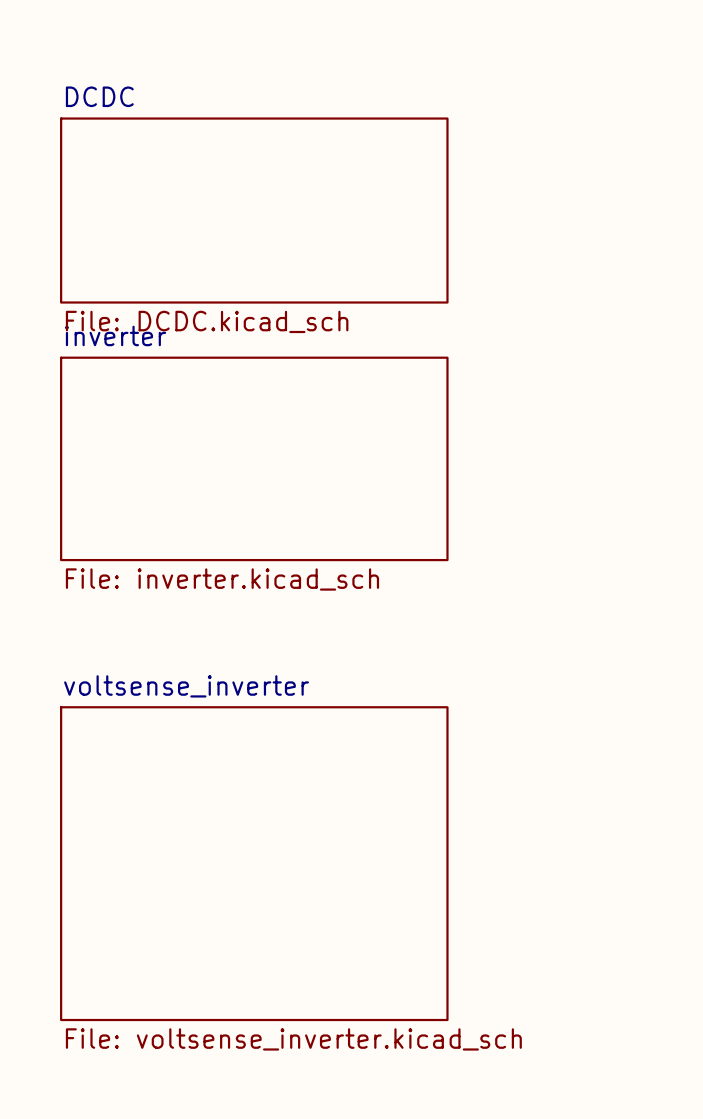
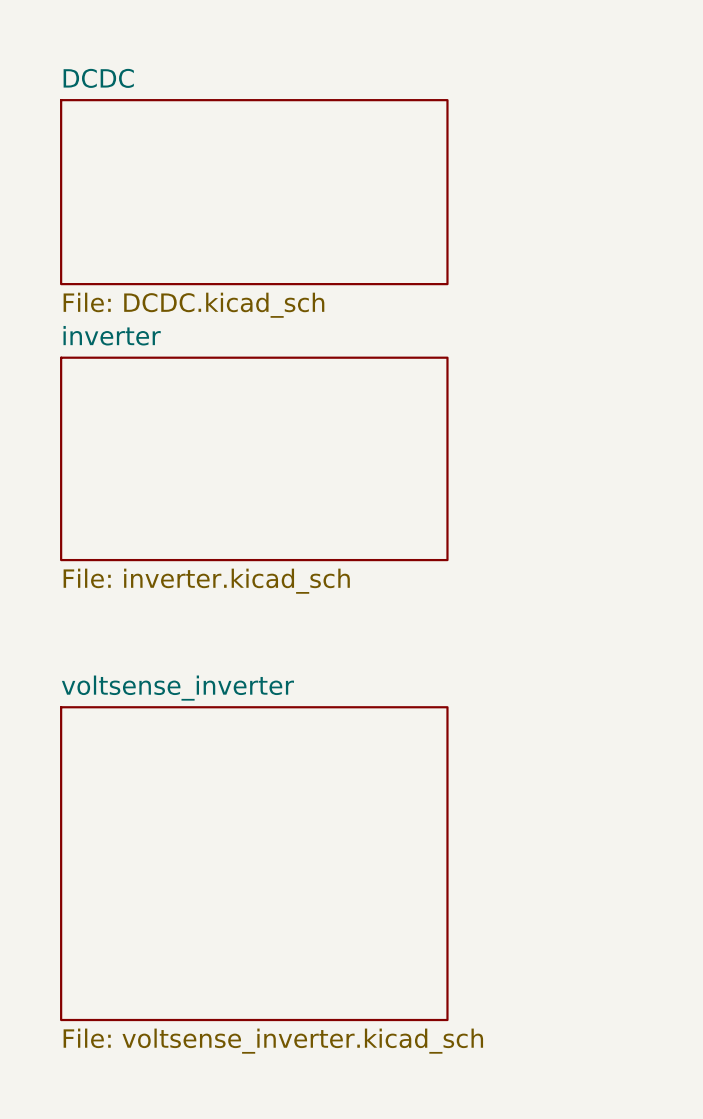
sheet DCDC position: (254, 210) -> (254, 192)

